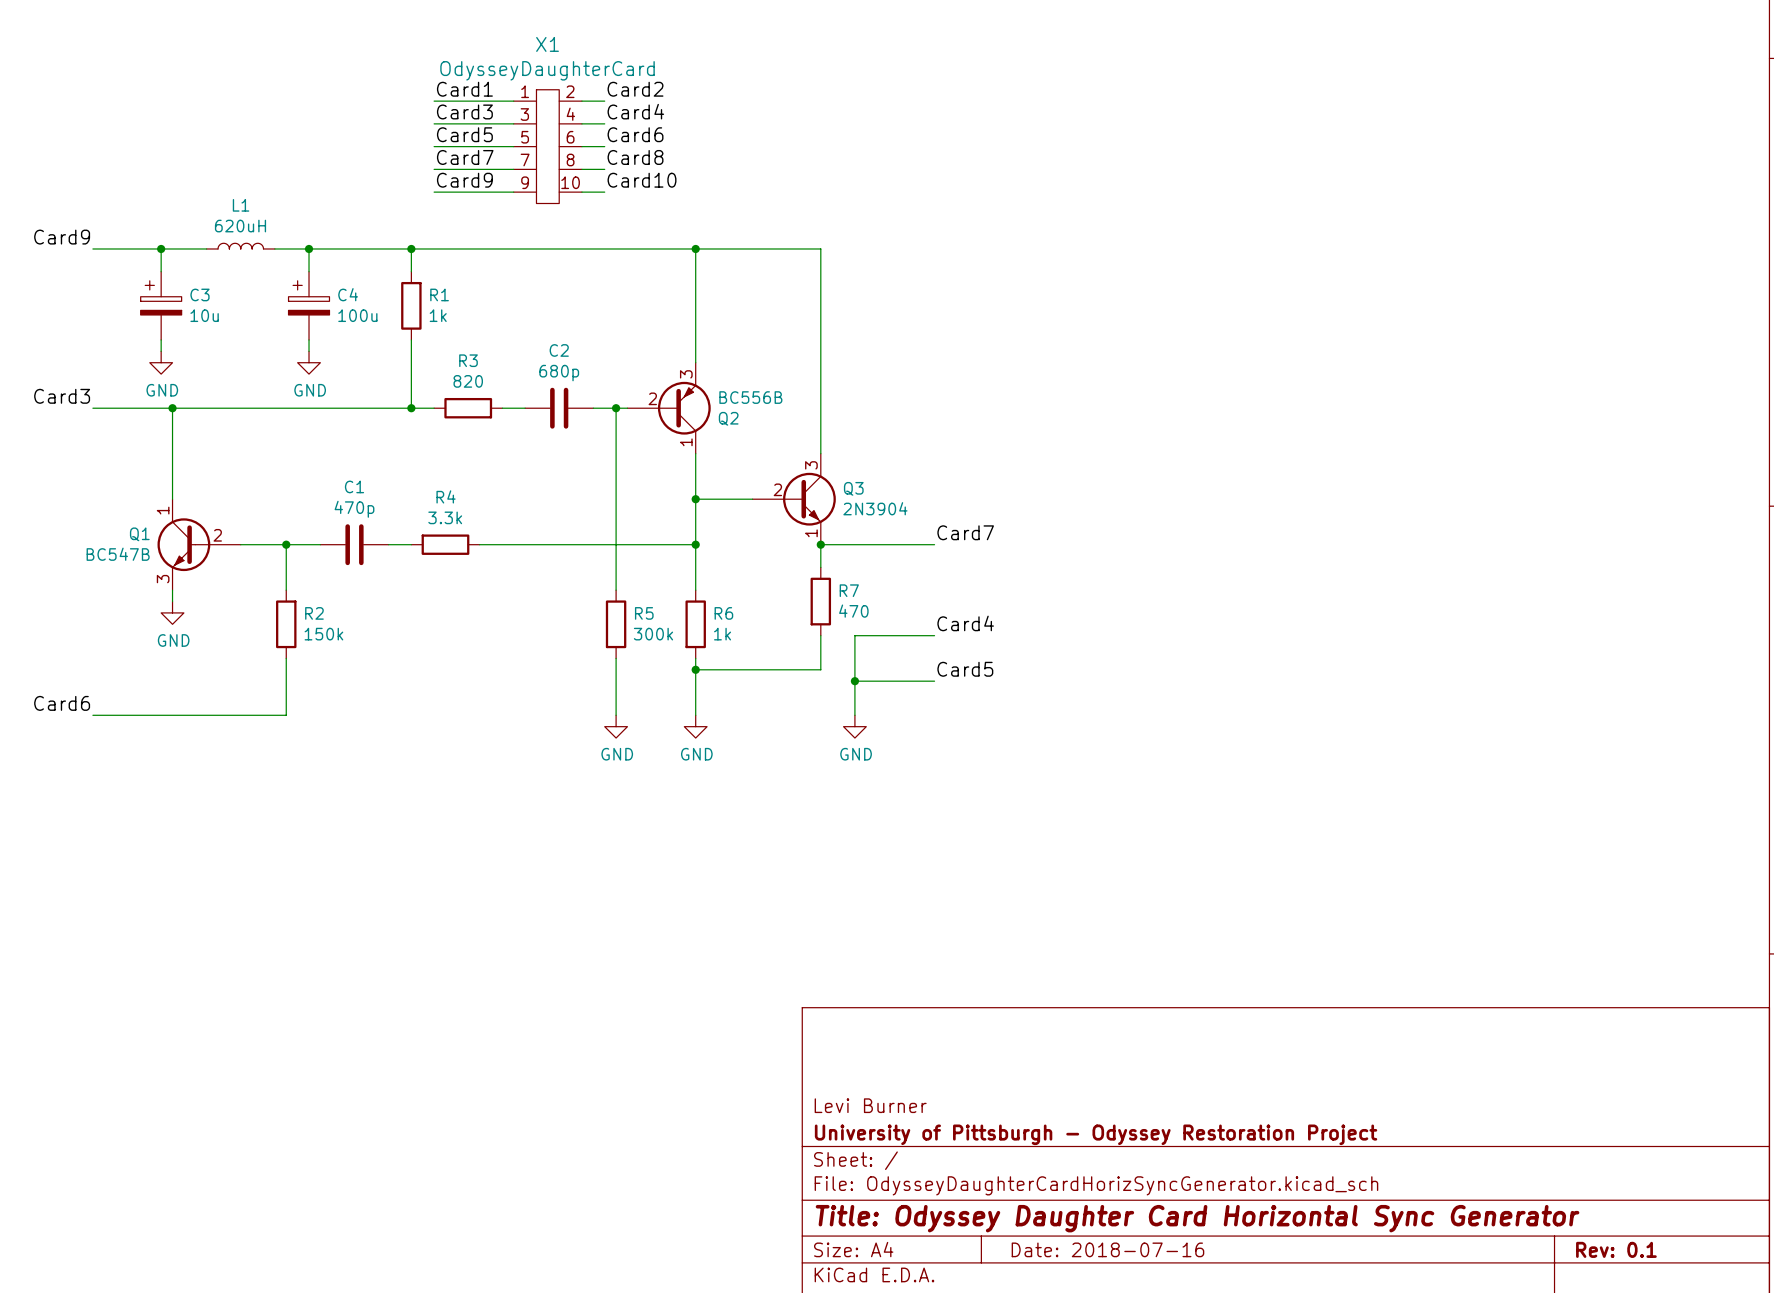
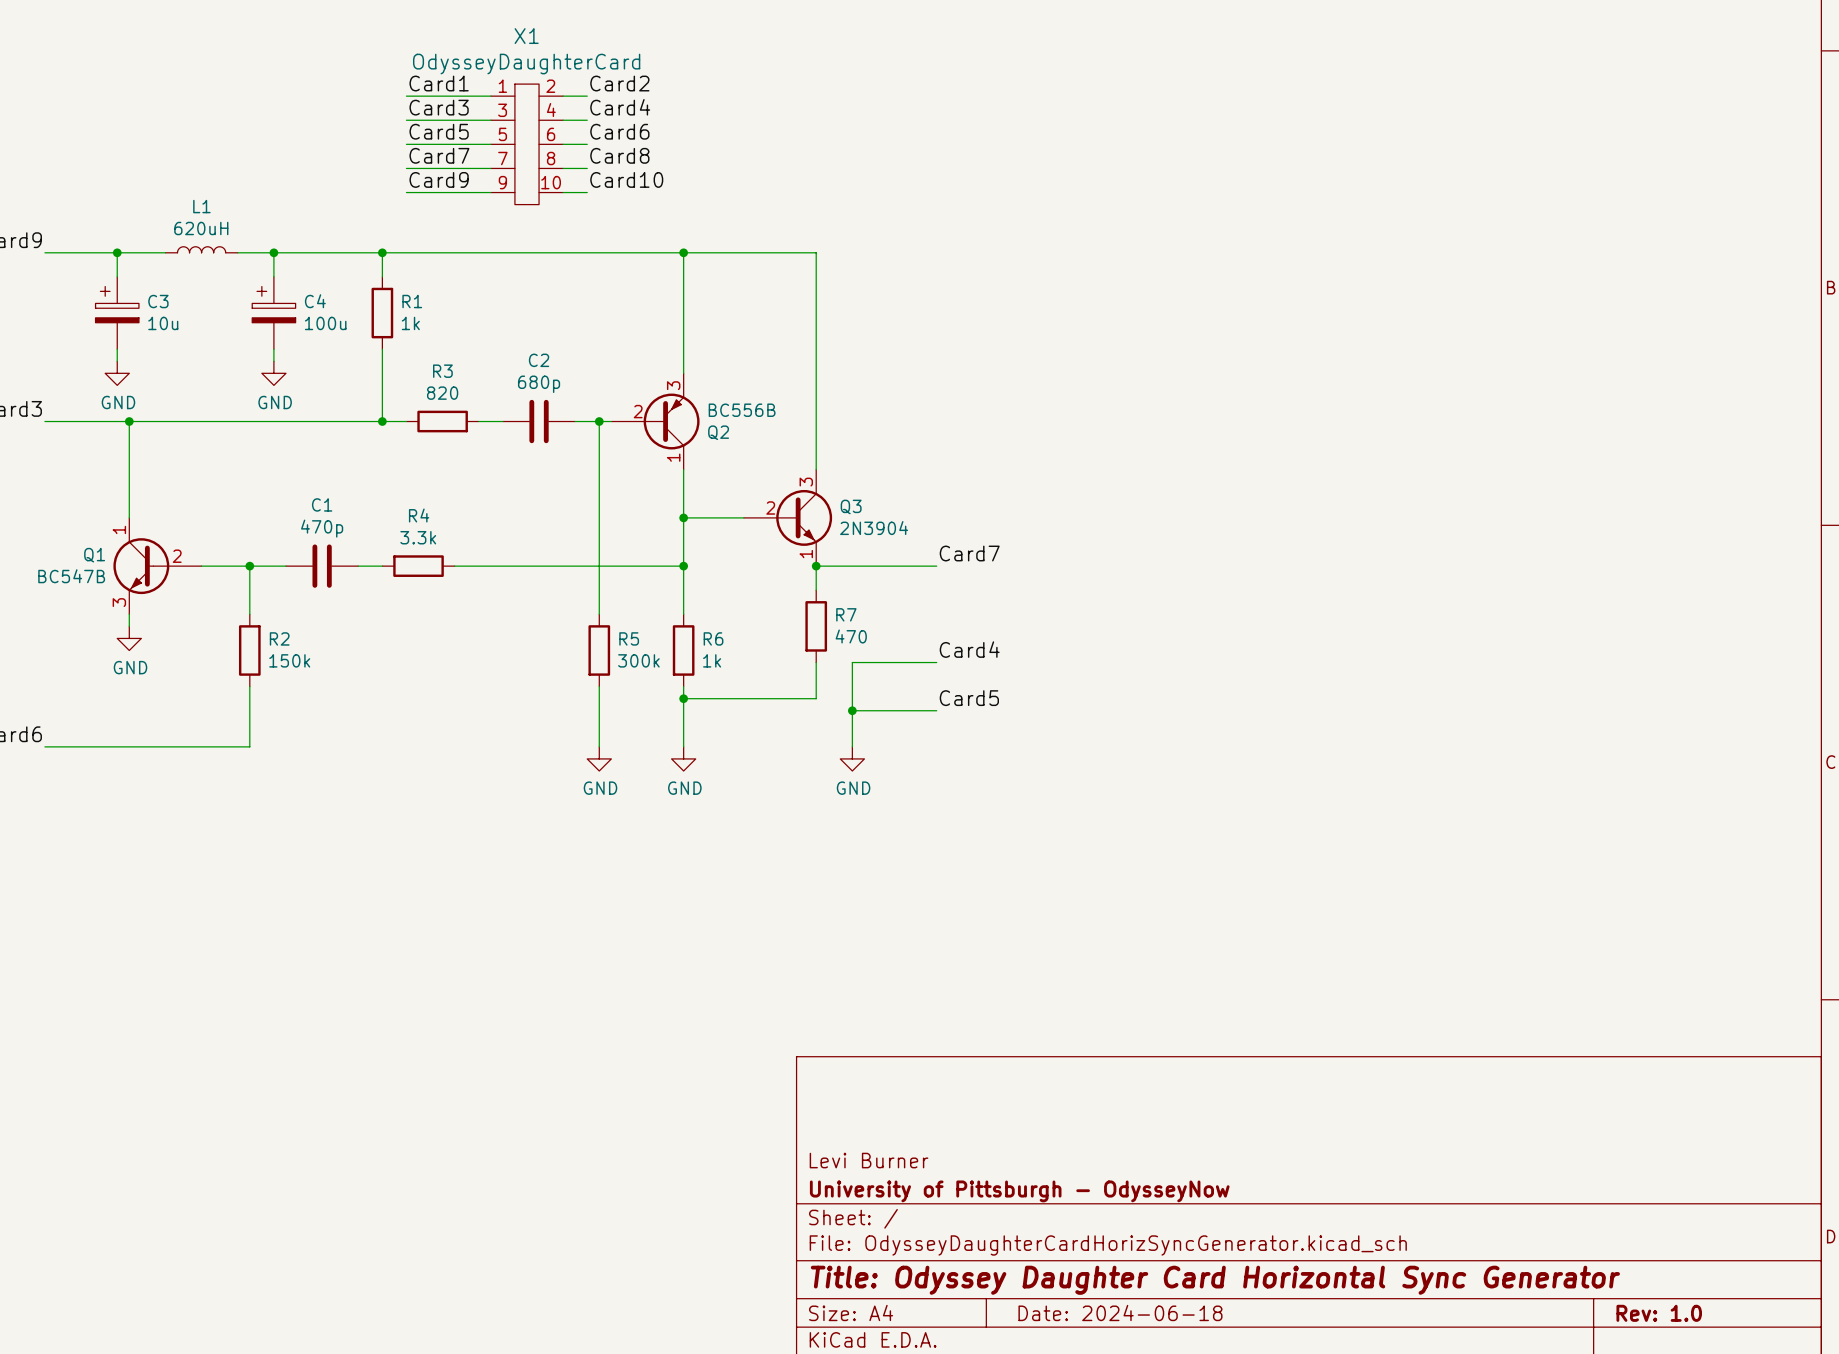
title block: University of Pittsburgh - Odyssey Restoration Project (1096, 1134) -> University of Pittsburgh - OdysseyNow (1019, 1191)
title block: Date: 2018-07-16 (1107, 1249) -> Date: 2024-06-18 (1120, 1312)
title block: Rev: 0.1 (1616, 1249) -> Rev: 1.0 (1659, 1313)

